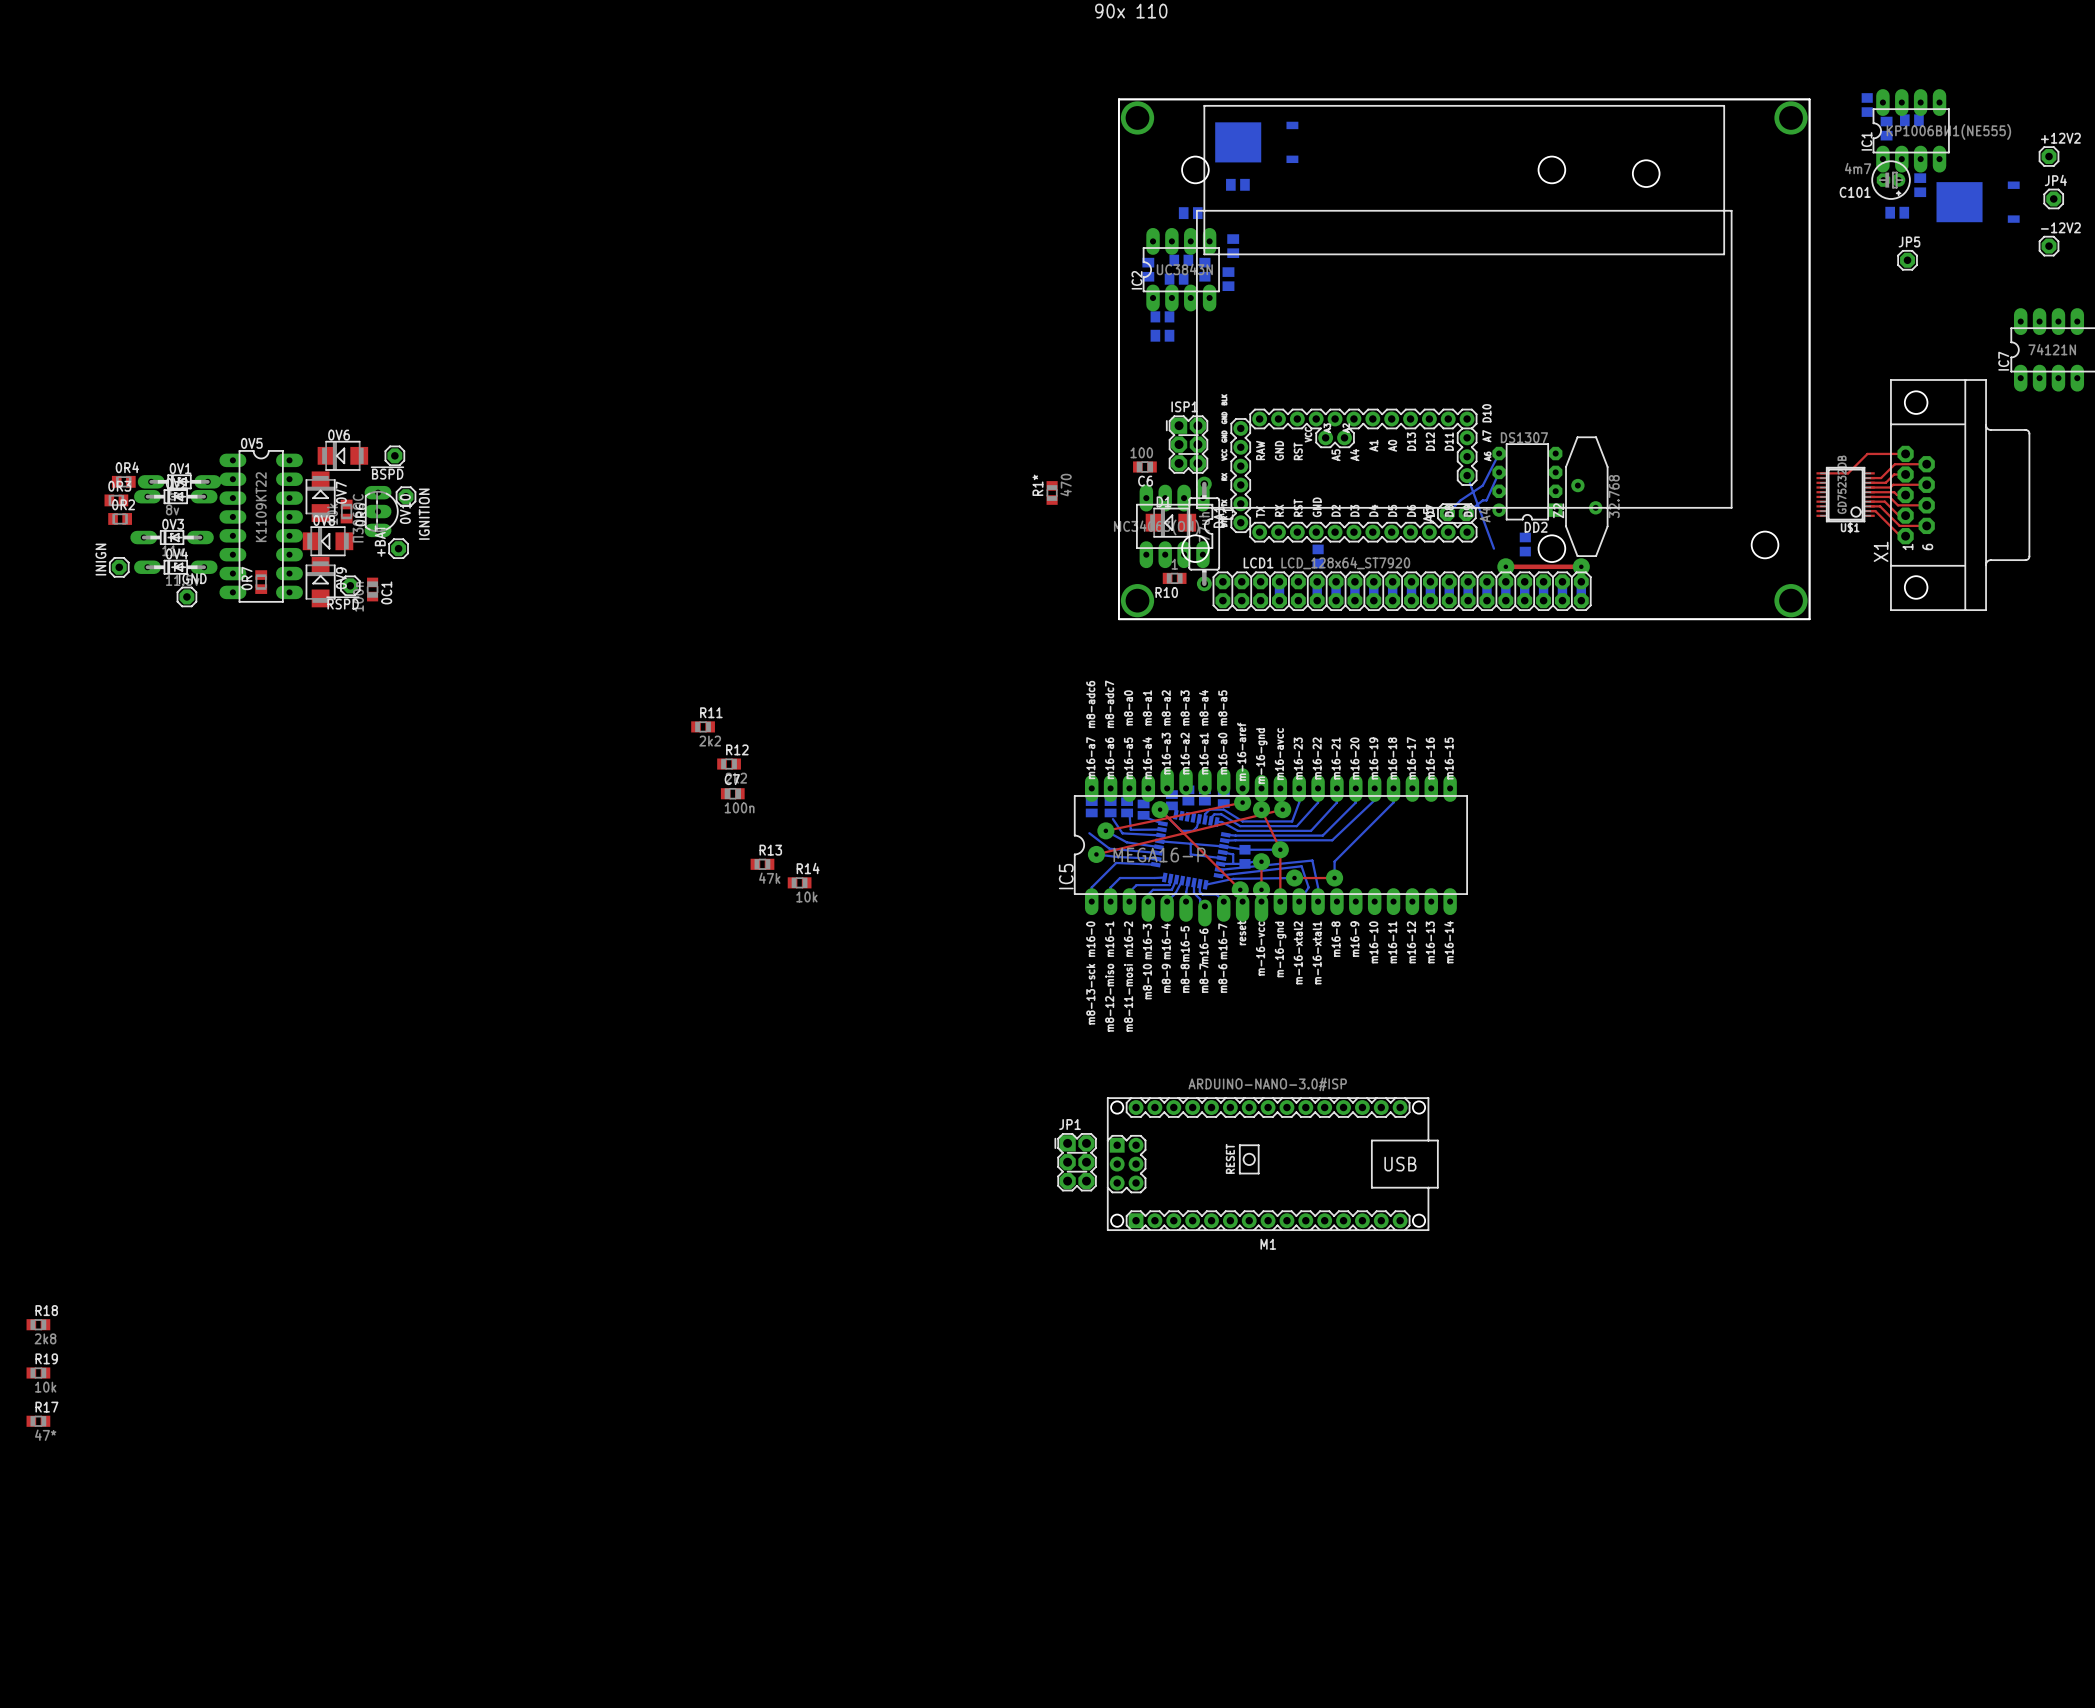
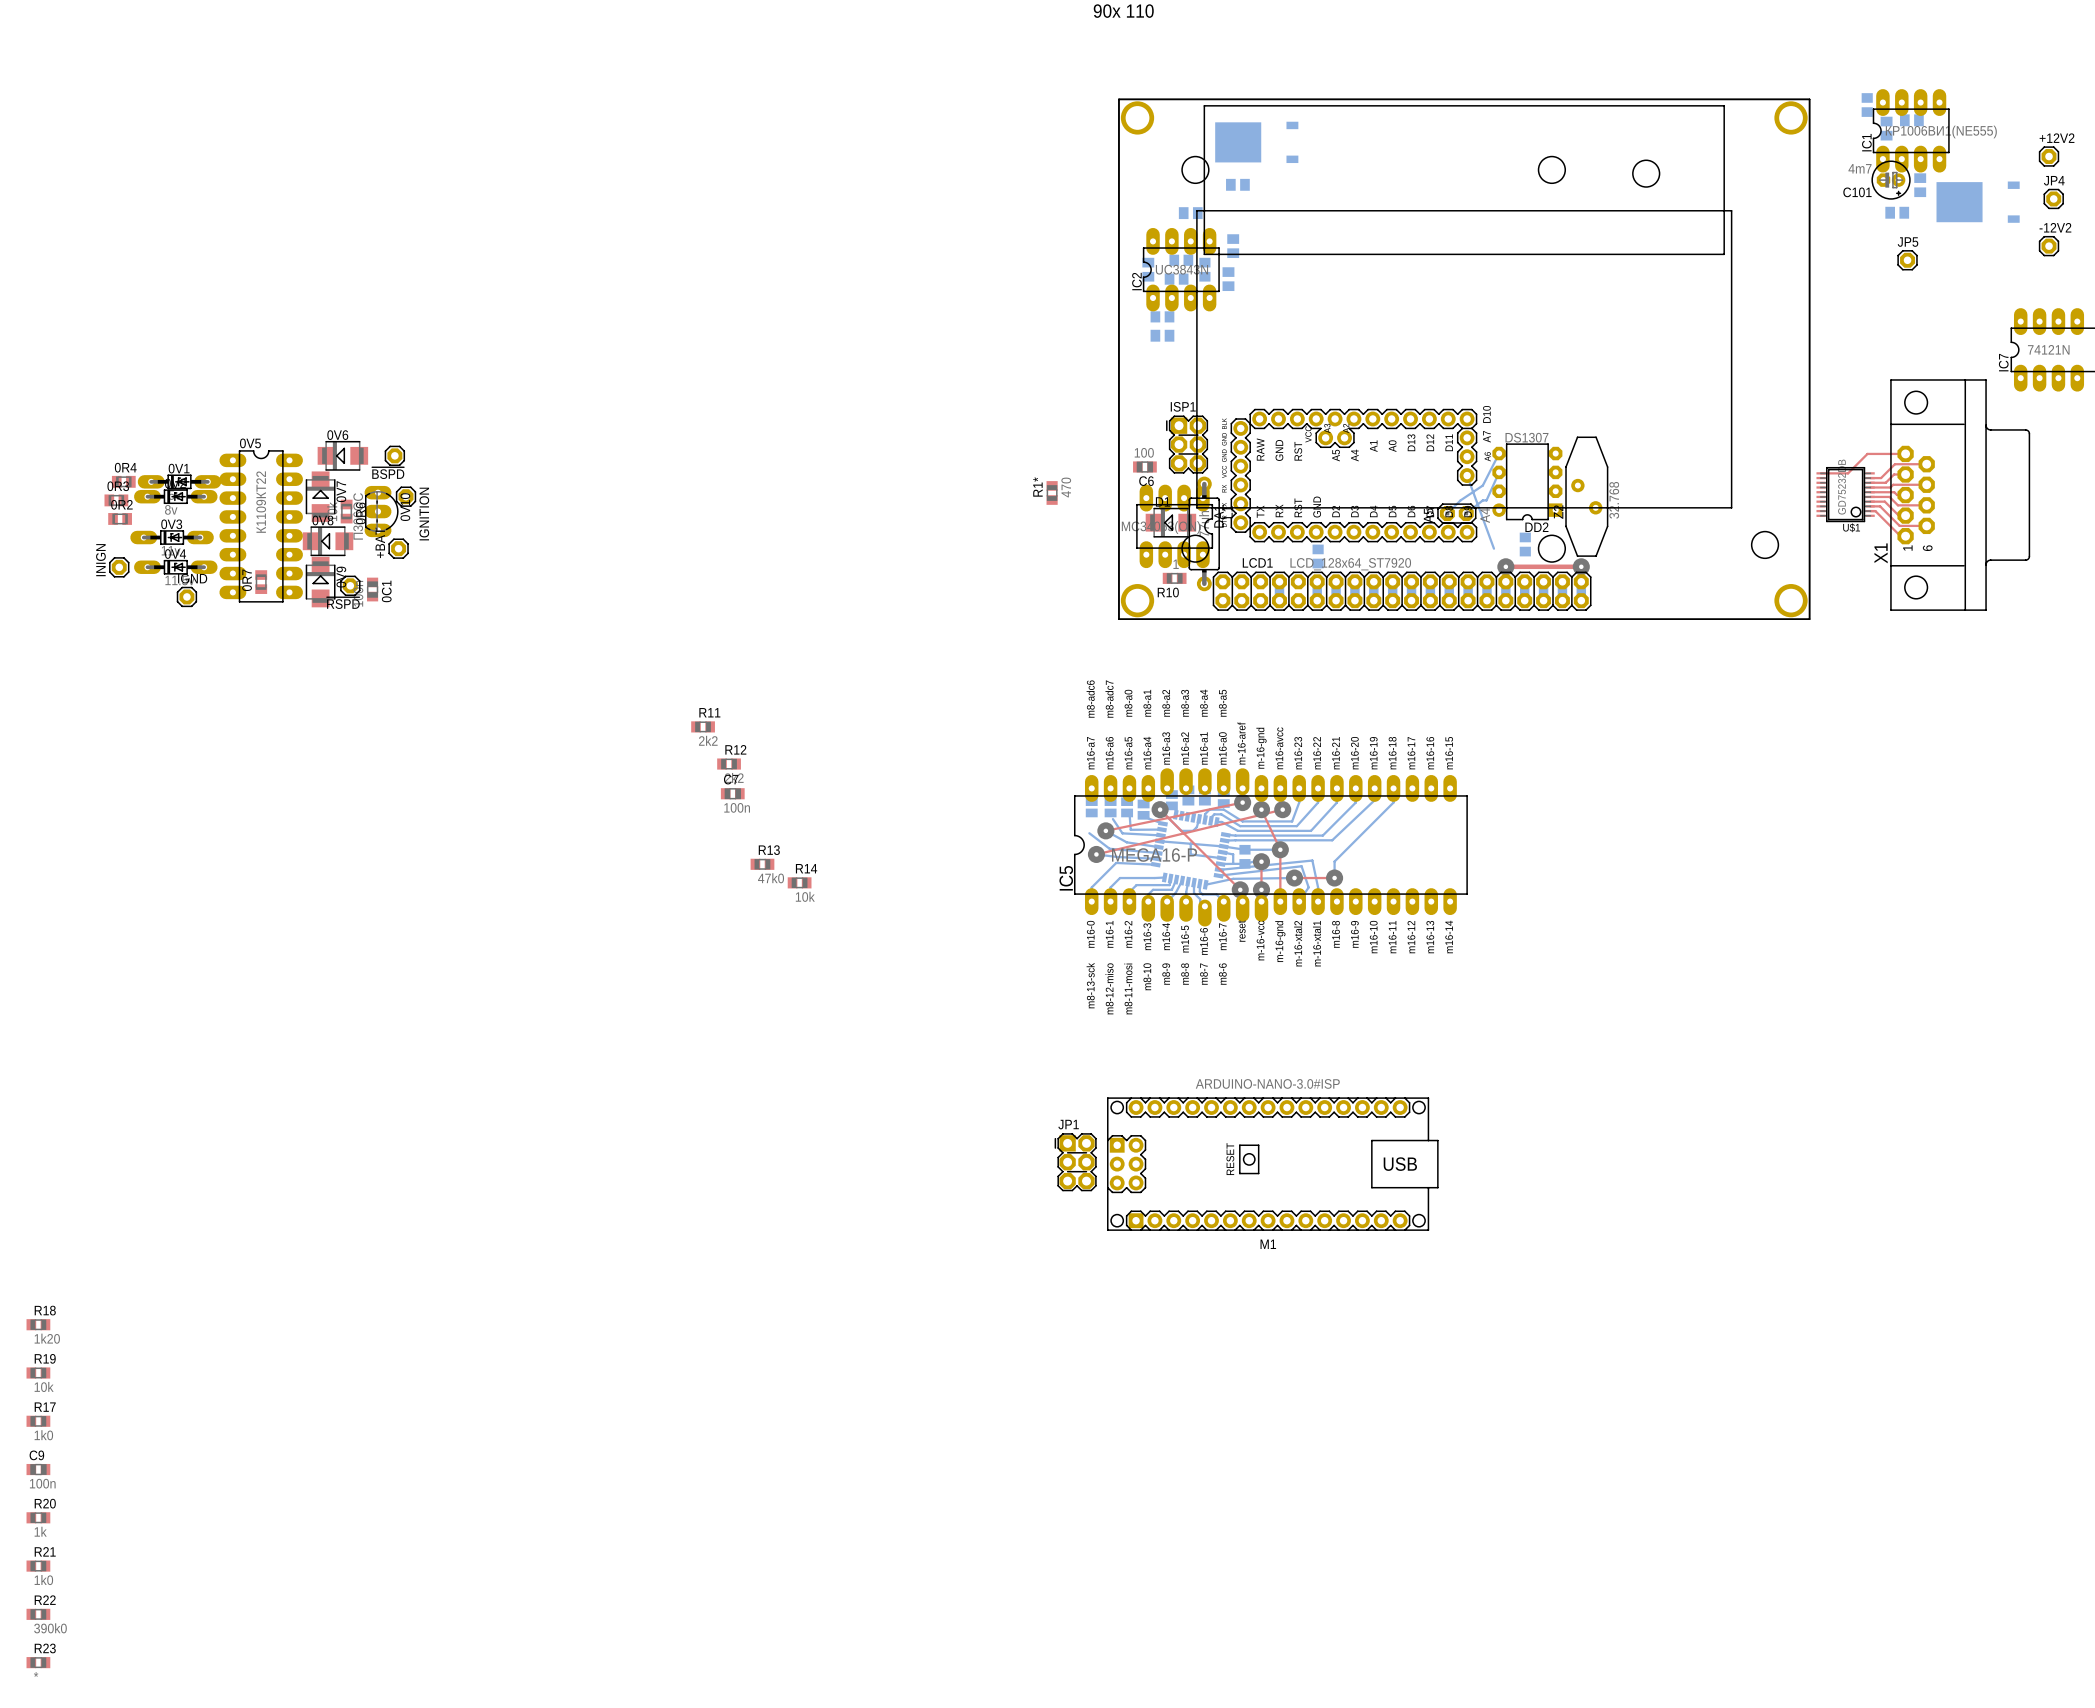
R13 value: 47k (769, 878) -> 47k0 (771, 878)
R18 value: 2k8 (45, 1338) -> 1k20 (47, 1338)
R17 value: 47* (45, 1435) -> 1k0 (43, 1435)
C9: none -> 100n (38, 1469)
R20: none -> 1k (38, 1517)
R21: none -> 1k0 (38, 1566)
R22: none -> 390k0 (38, 1614)
R23: none -> * (38, 1662)

